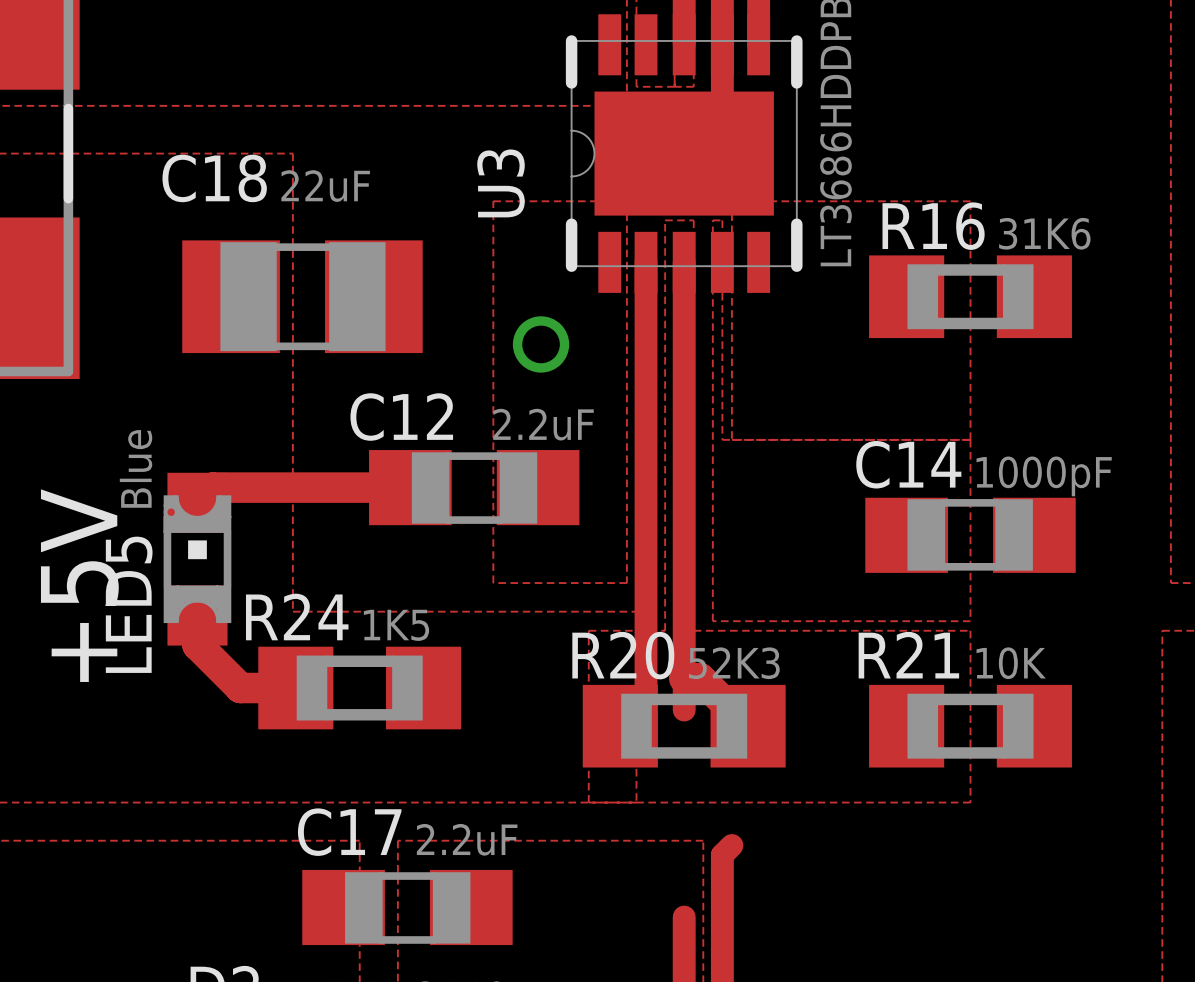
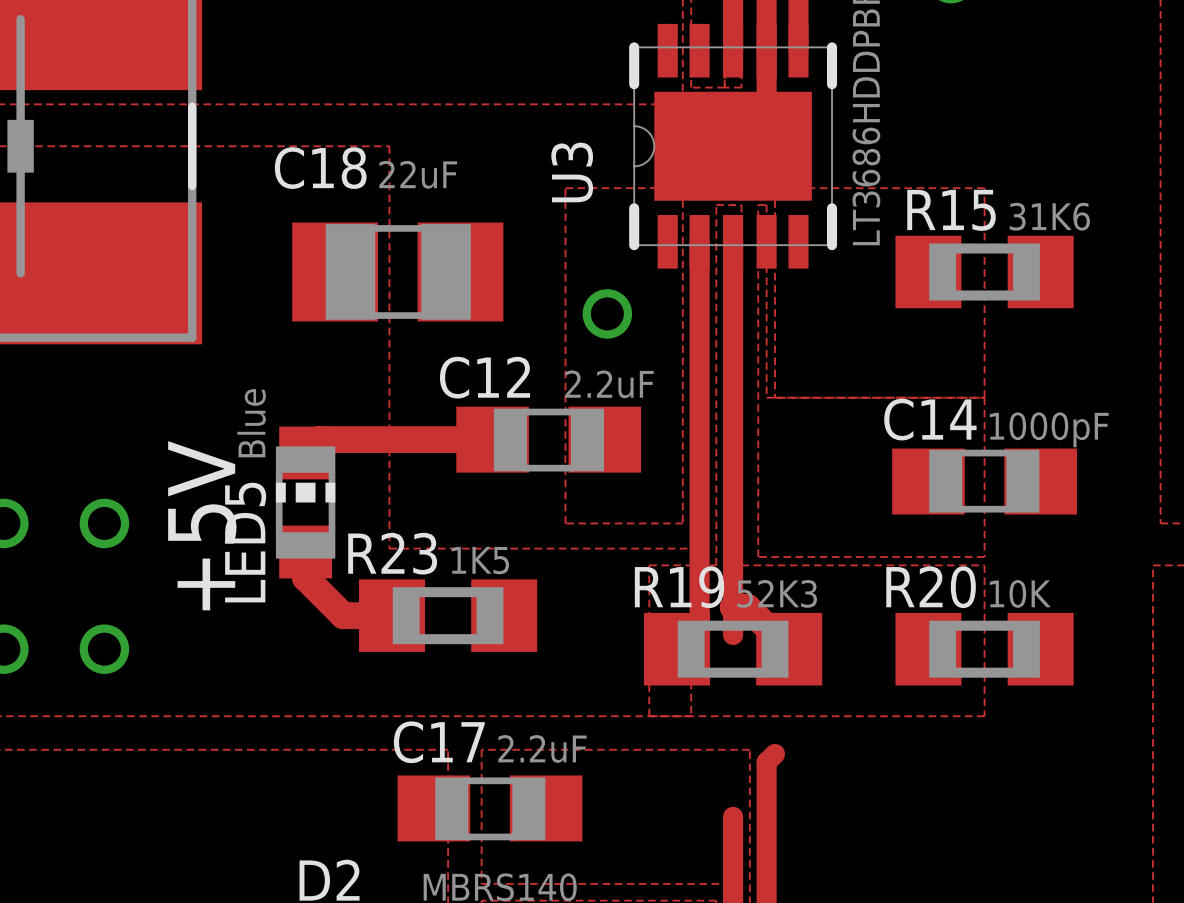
R16 name: R16 (933, 226) -> R15 (951, 210)
LED5 footprint: [163, 472, 232, 646] -> [275, 426, 336, 579]
R24 name: R24 (297, 616) -> R23 (392, 553)
R20 name: R20 (623, 655) -> R19 (679, 587)
R21 name: R21 (908, 655) -> R20 (931, 587)

